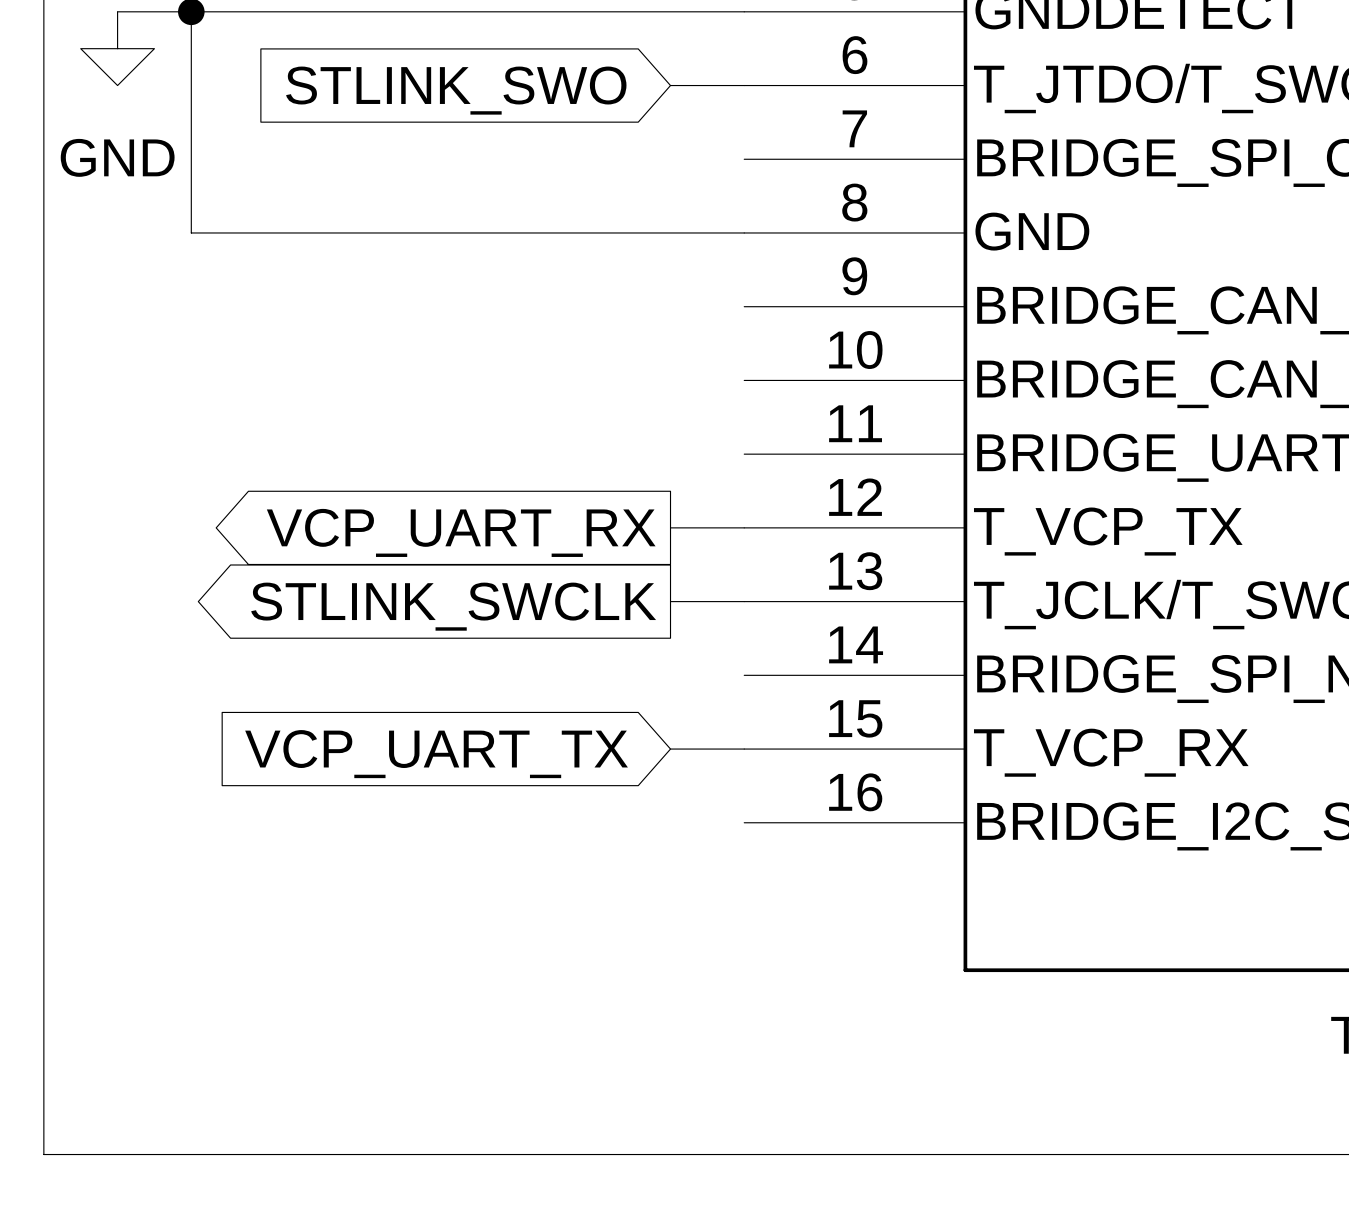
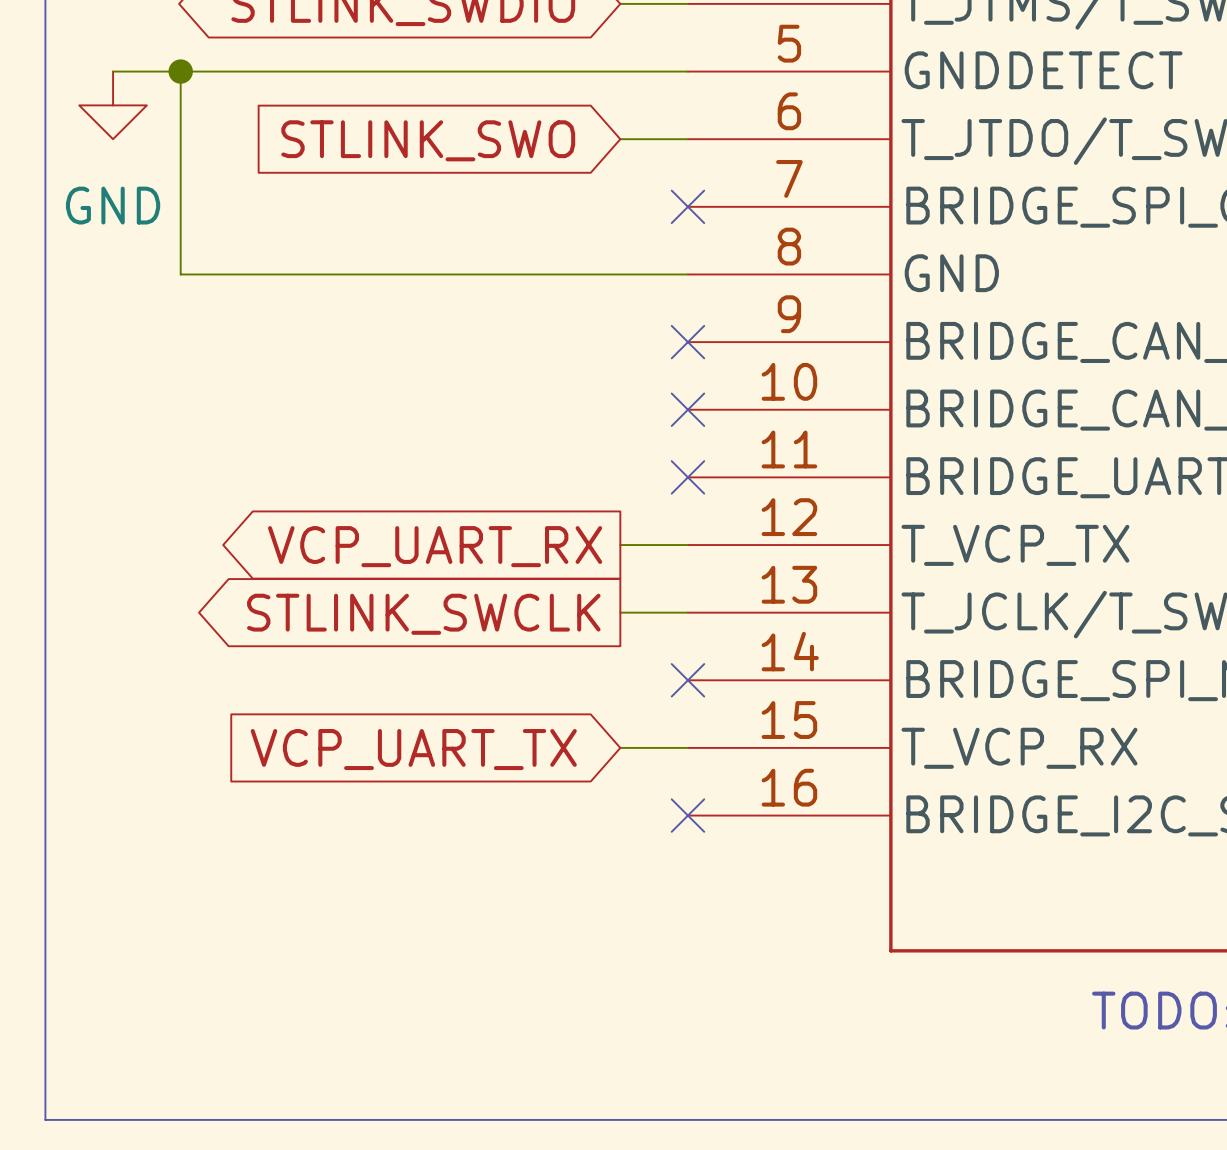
no-connect mark: none -> (687, 206)
no-connect mark: none -> (687, 342)
no-connect mark: none -> (687, 409)
no-connect mark: none -> (687, 477)
no-connect mark: none -> (687, 680)
no-connect mark: none -> (687, 815)

